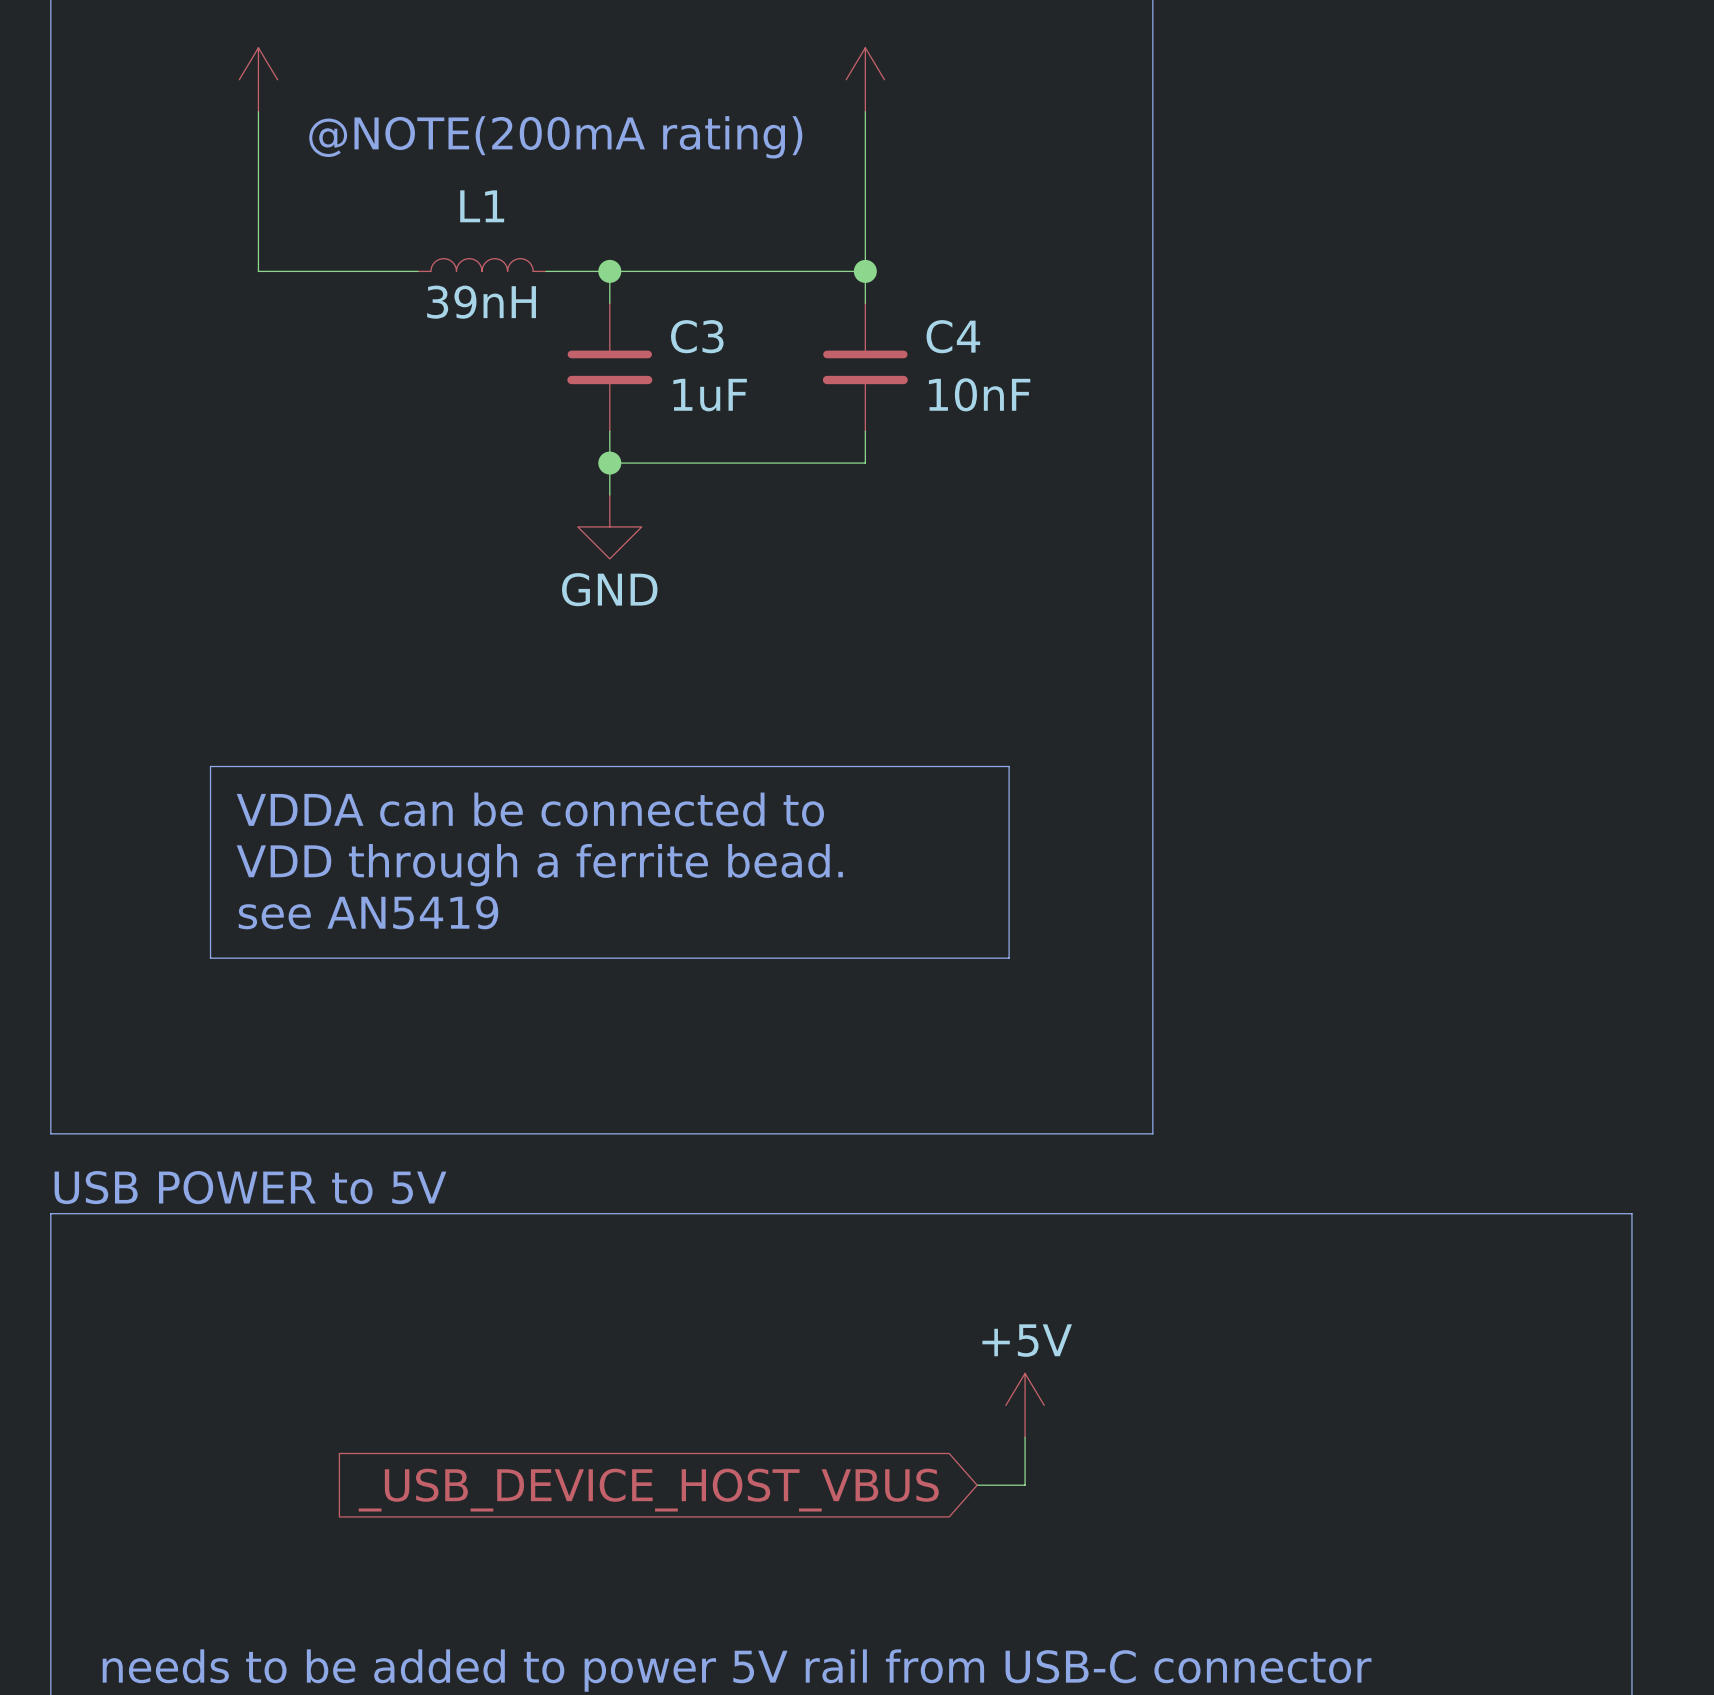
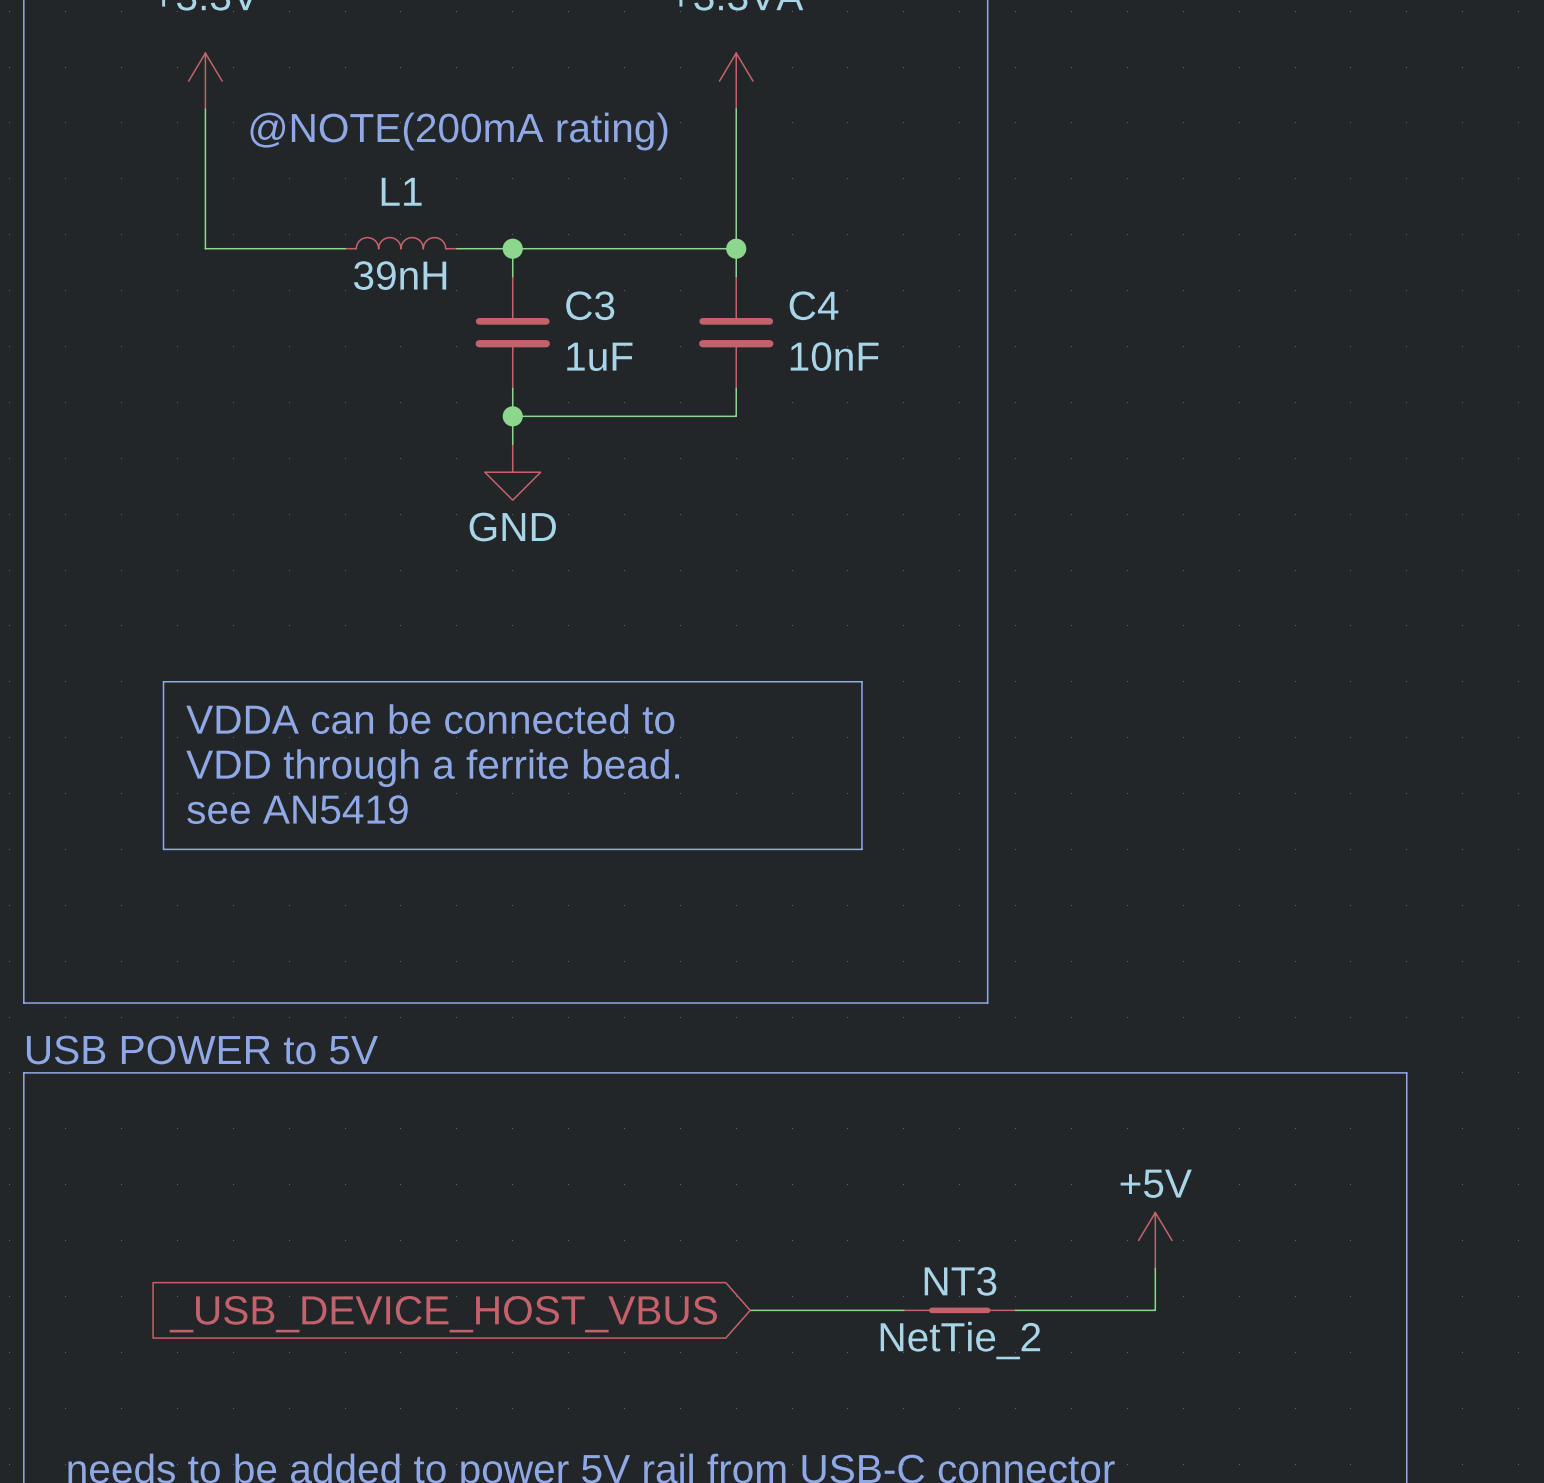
power symbol position: +5V (1025, 1405) -> +5V (1155, 1240)
wire: (1025, 1437) (1025, 1485) -> (903, 1310) (875, 1310)
wire: none -> (1155, 1268) (1155, 1310) (1015, 1310)
wire: none -> (750, 1310) (834, 1310)
NT3: none -> NetTie_2 (959, 1310)
global label position: _USB_DEVICE_HOST_VBUS (648, 1490) -> _USB_DEVICE_HOST_VBUS (443, 1314)

